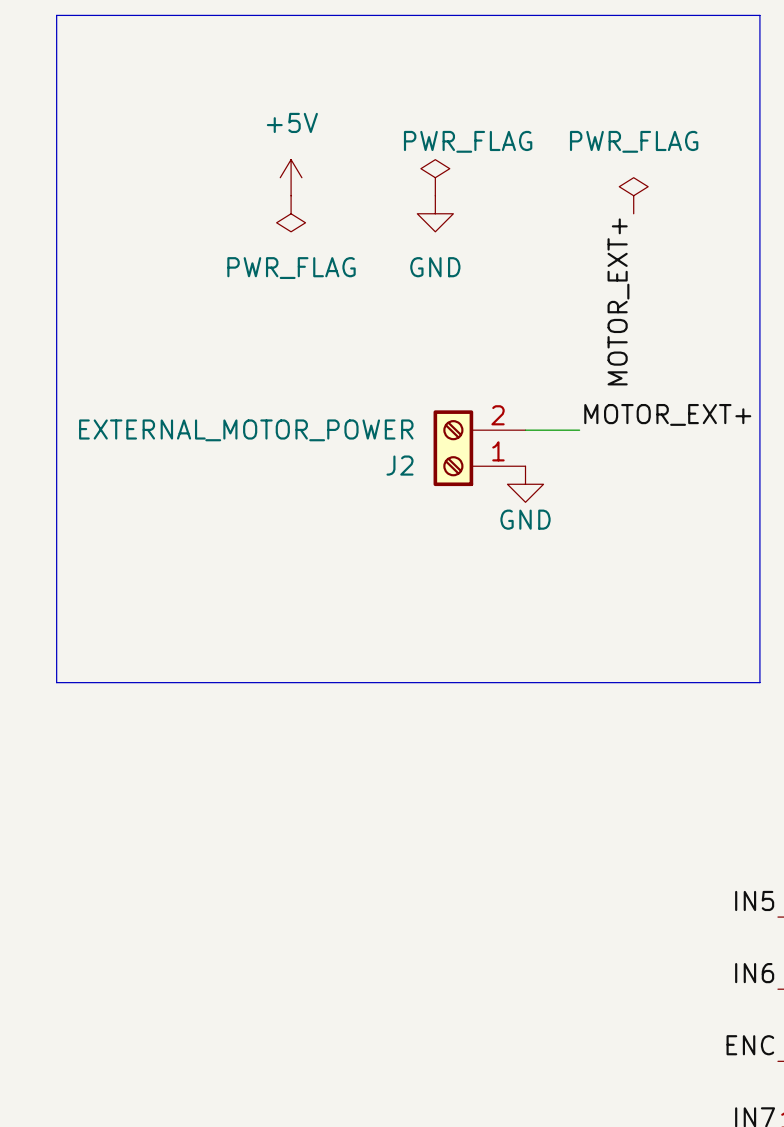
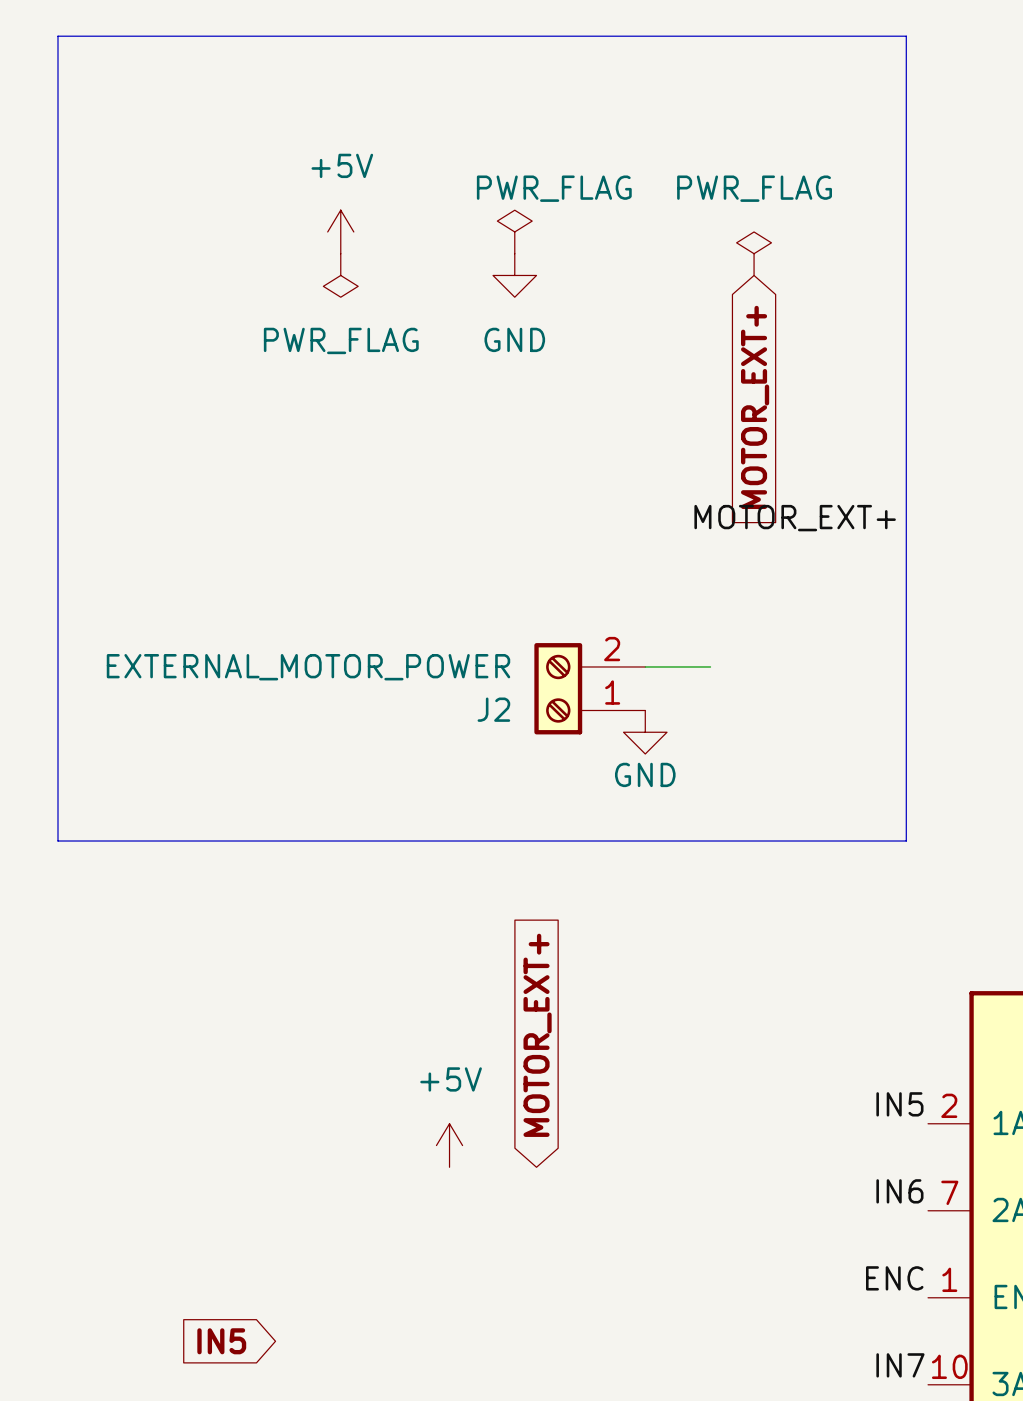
label: MOTOR_EXT+ (618, 301) -> none
global label: none -> MOTOR_EXT+ (755, 407)
wire: (525, 430) (579, 430) -> (645, 666) (710, 666)
J2 position: (479, 448) -> (589, 688)
power symbol position: GND (525, 484) -> GND (645, 732)
global label: none -> MOTOR_EXT+ (537, 1035)
power symbol: none -> +5V (449, 1145)
global label: none -> IN5 (221, 1341)

